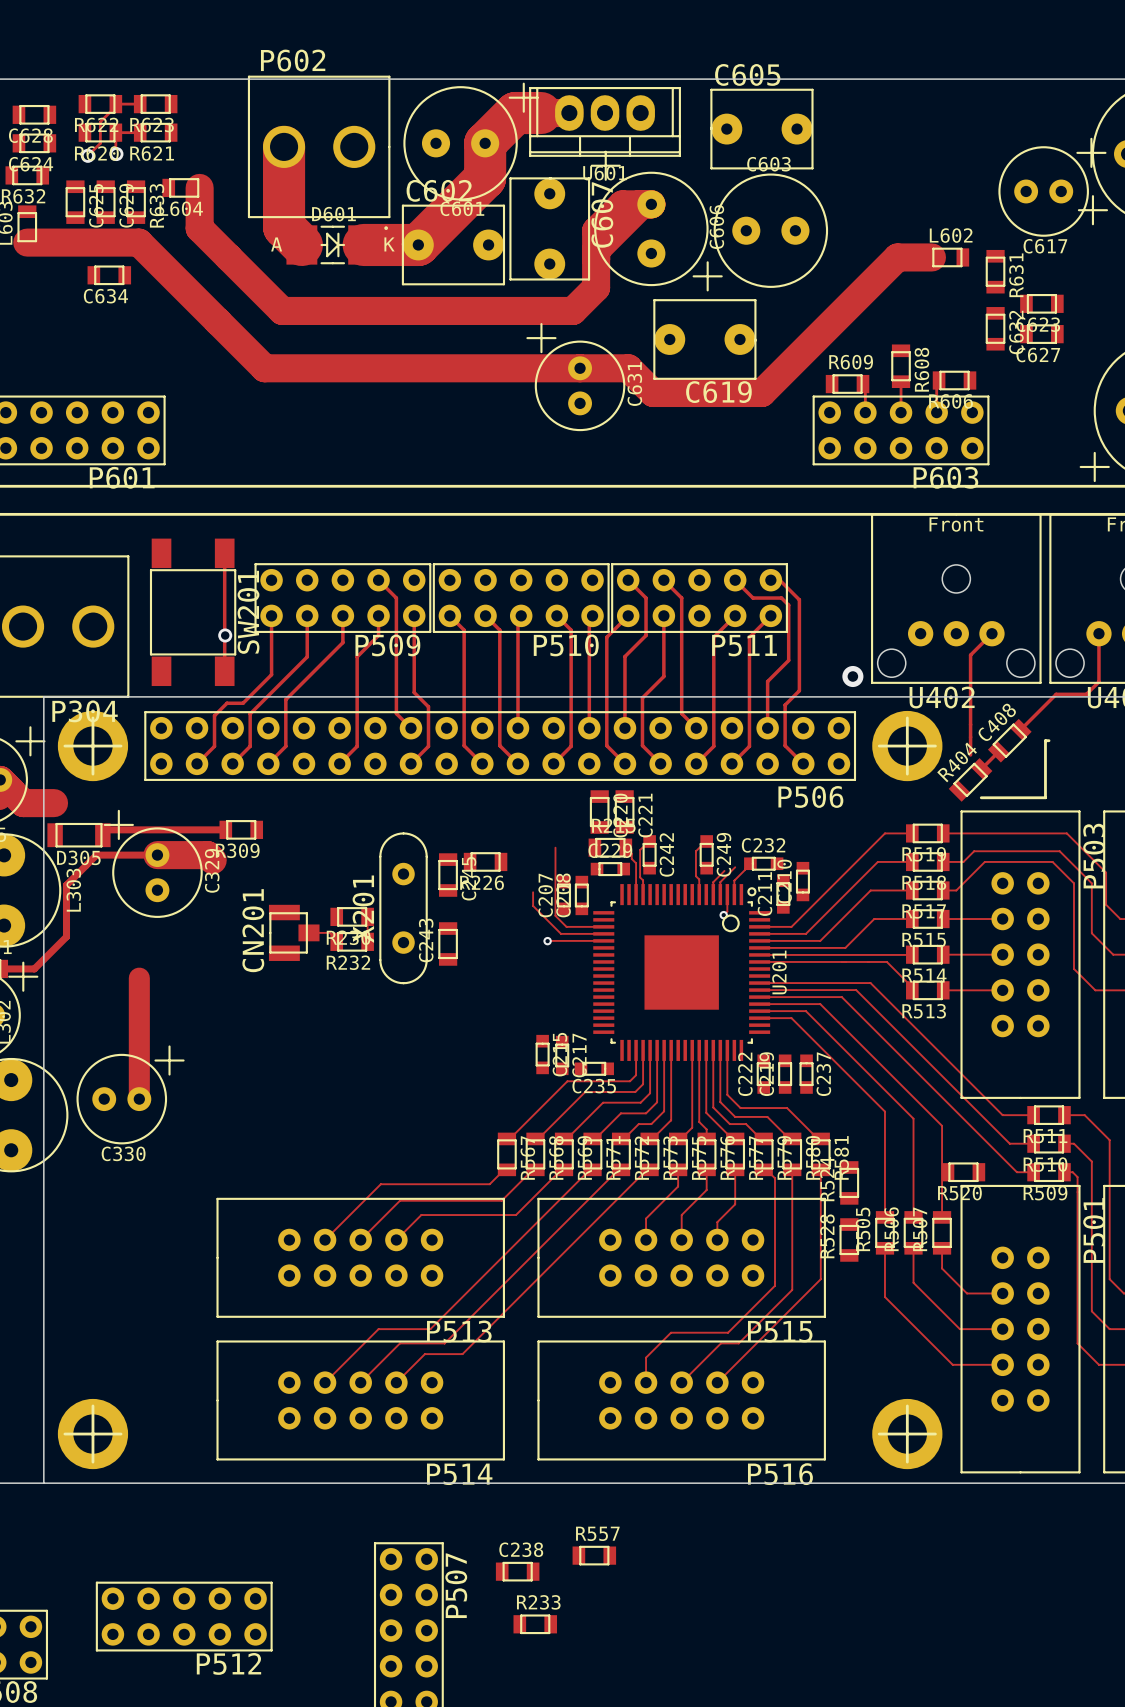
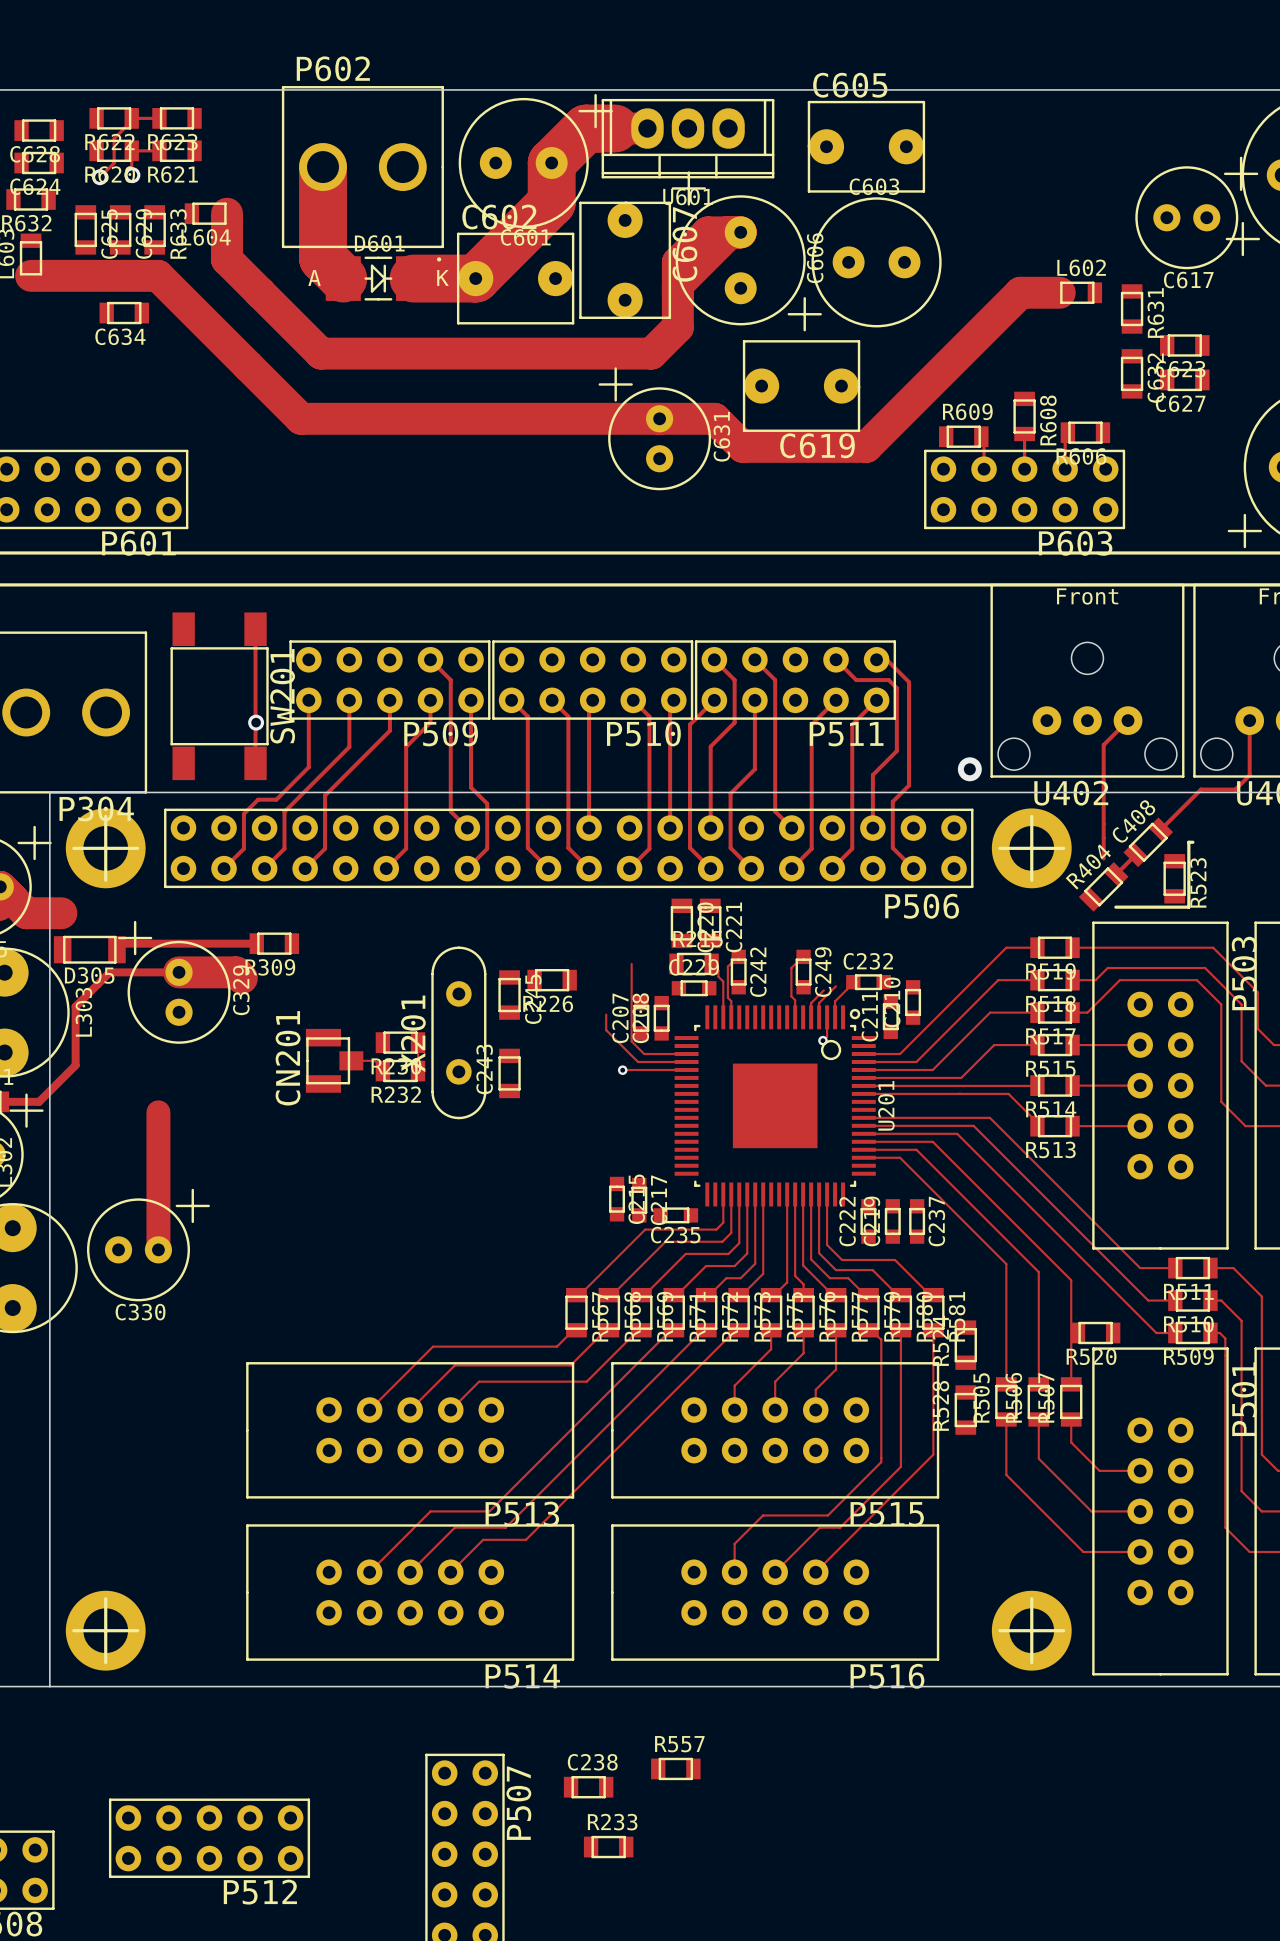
R523: none -> (1174, 878)

